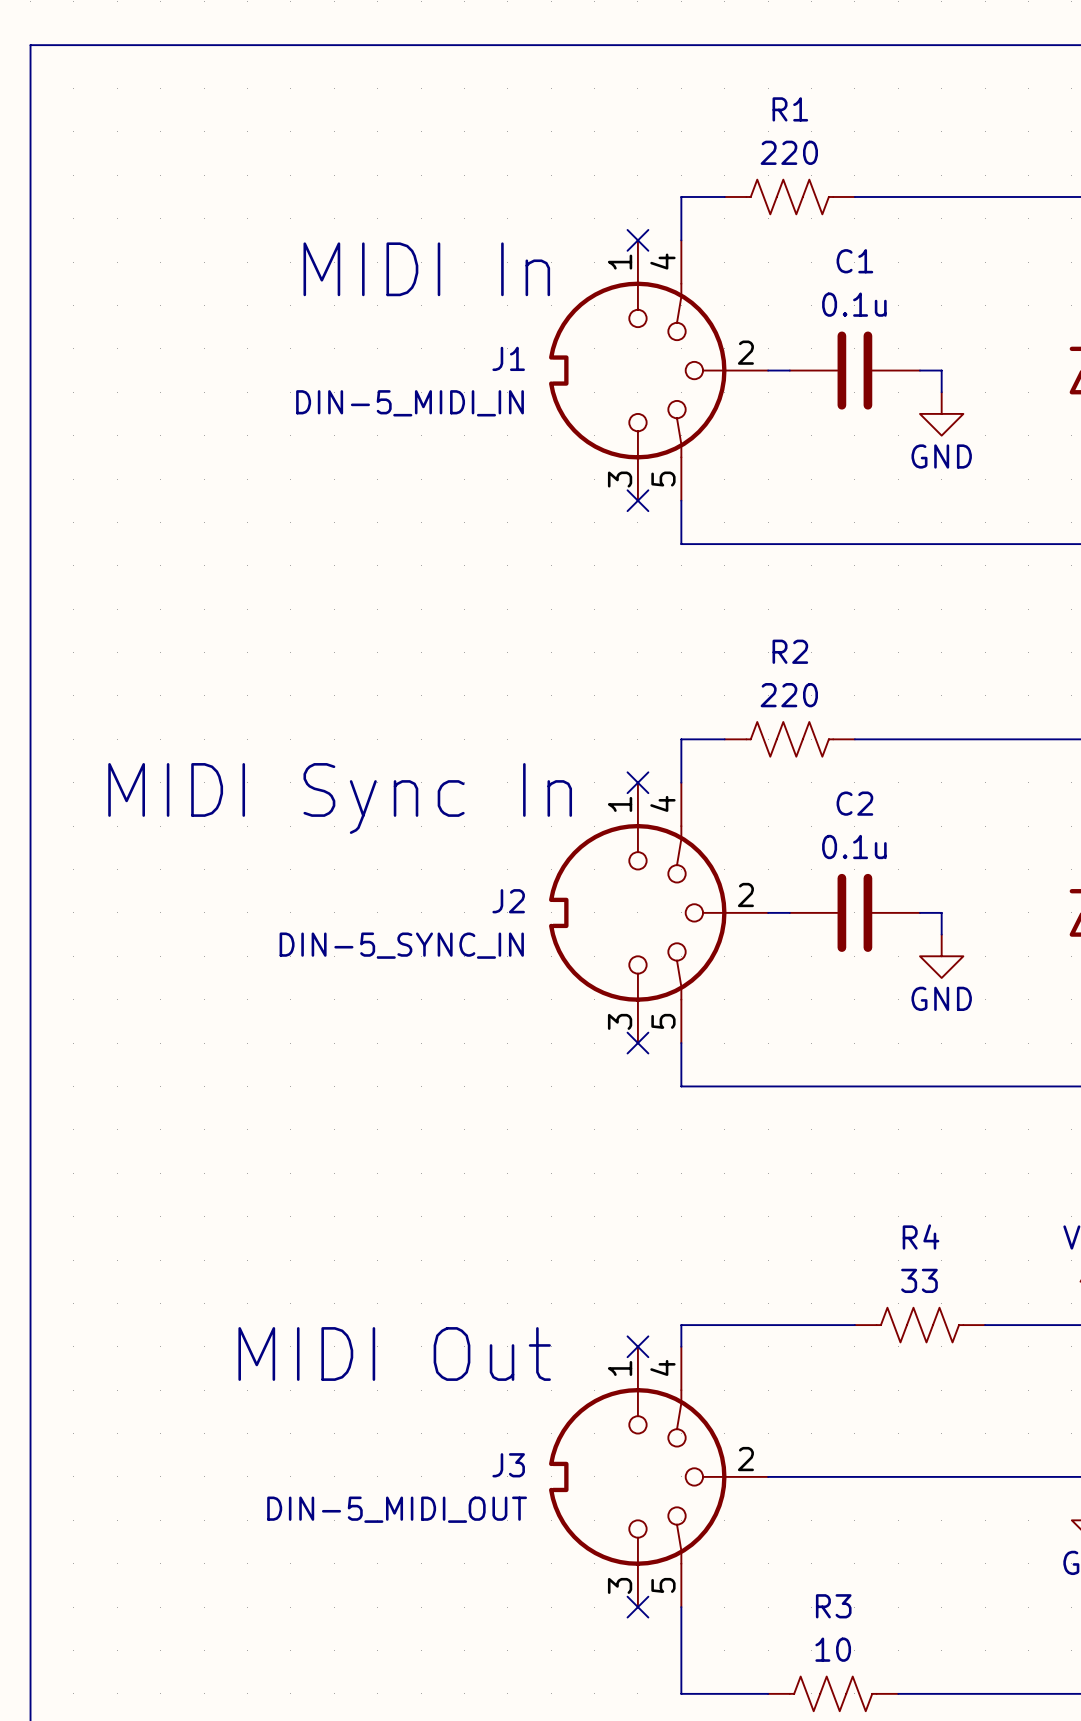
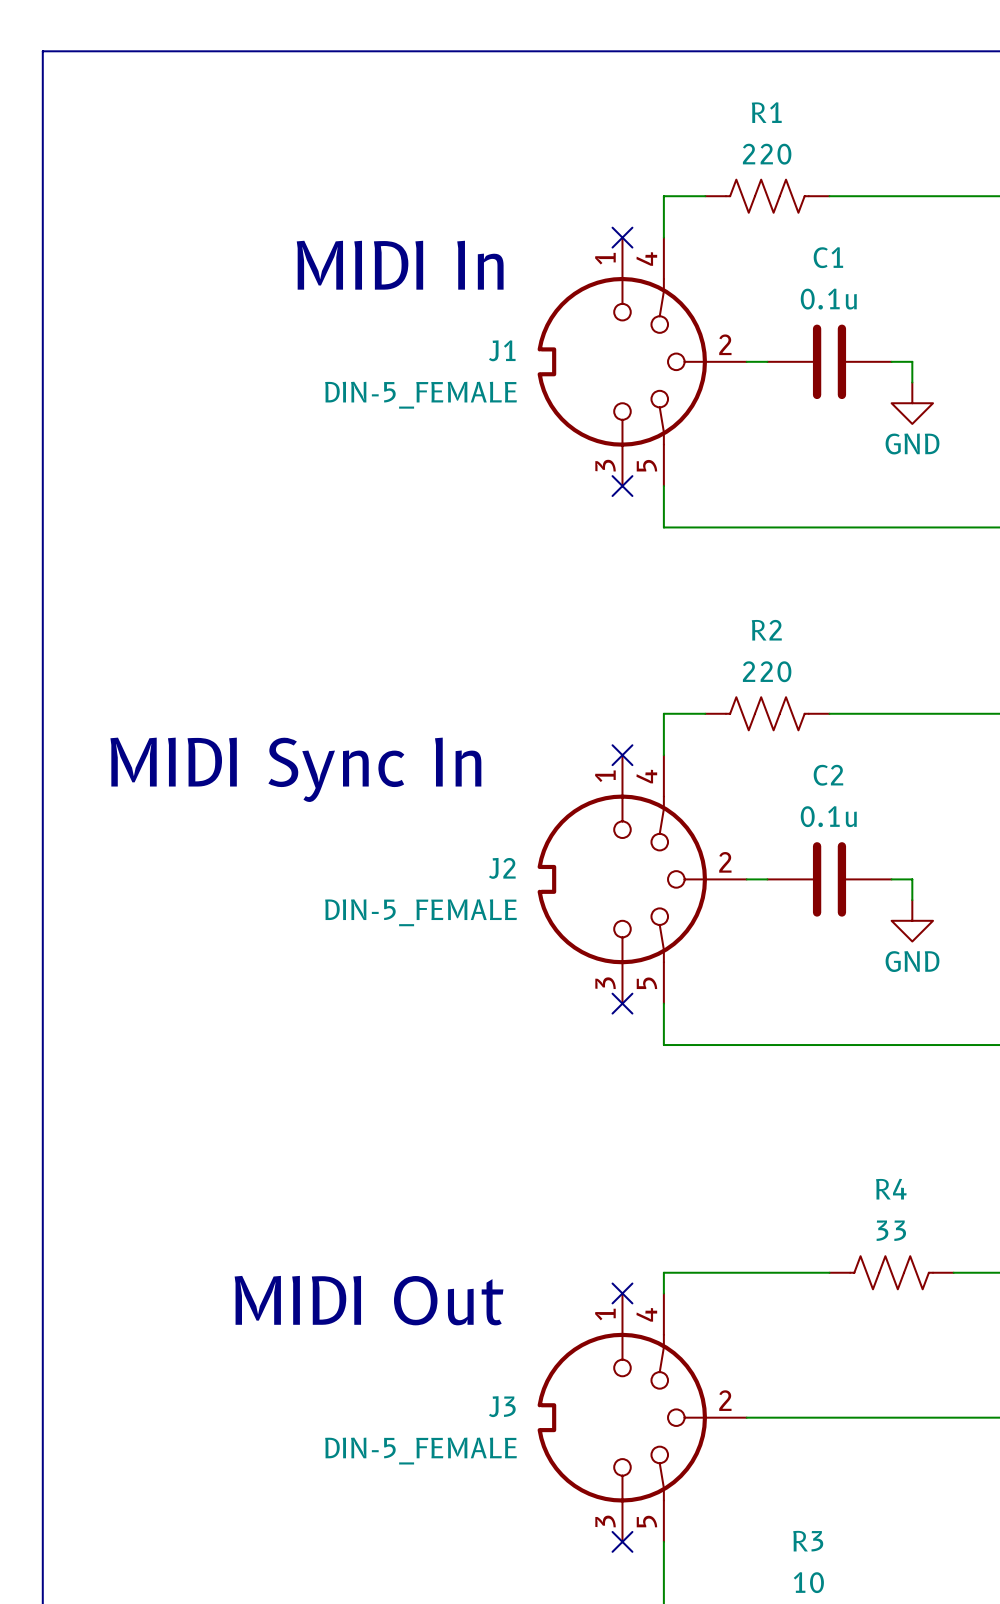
J1 value: DIN-5_MIDI_IN (410, 403) -> DIN-5_FEMALE (421, 395)
J2 value: DIN-5_SYNC_IN (401, 945) -> DIN-5_FEMALE (421, 912)
J3 value: DIN-5_MIDI_OUT (397, 1509) -> DIN-5_FEMALE (421, 1451)

